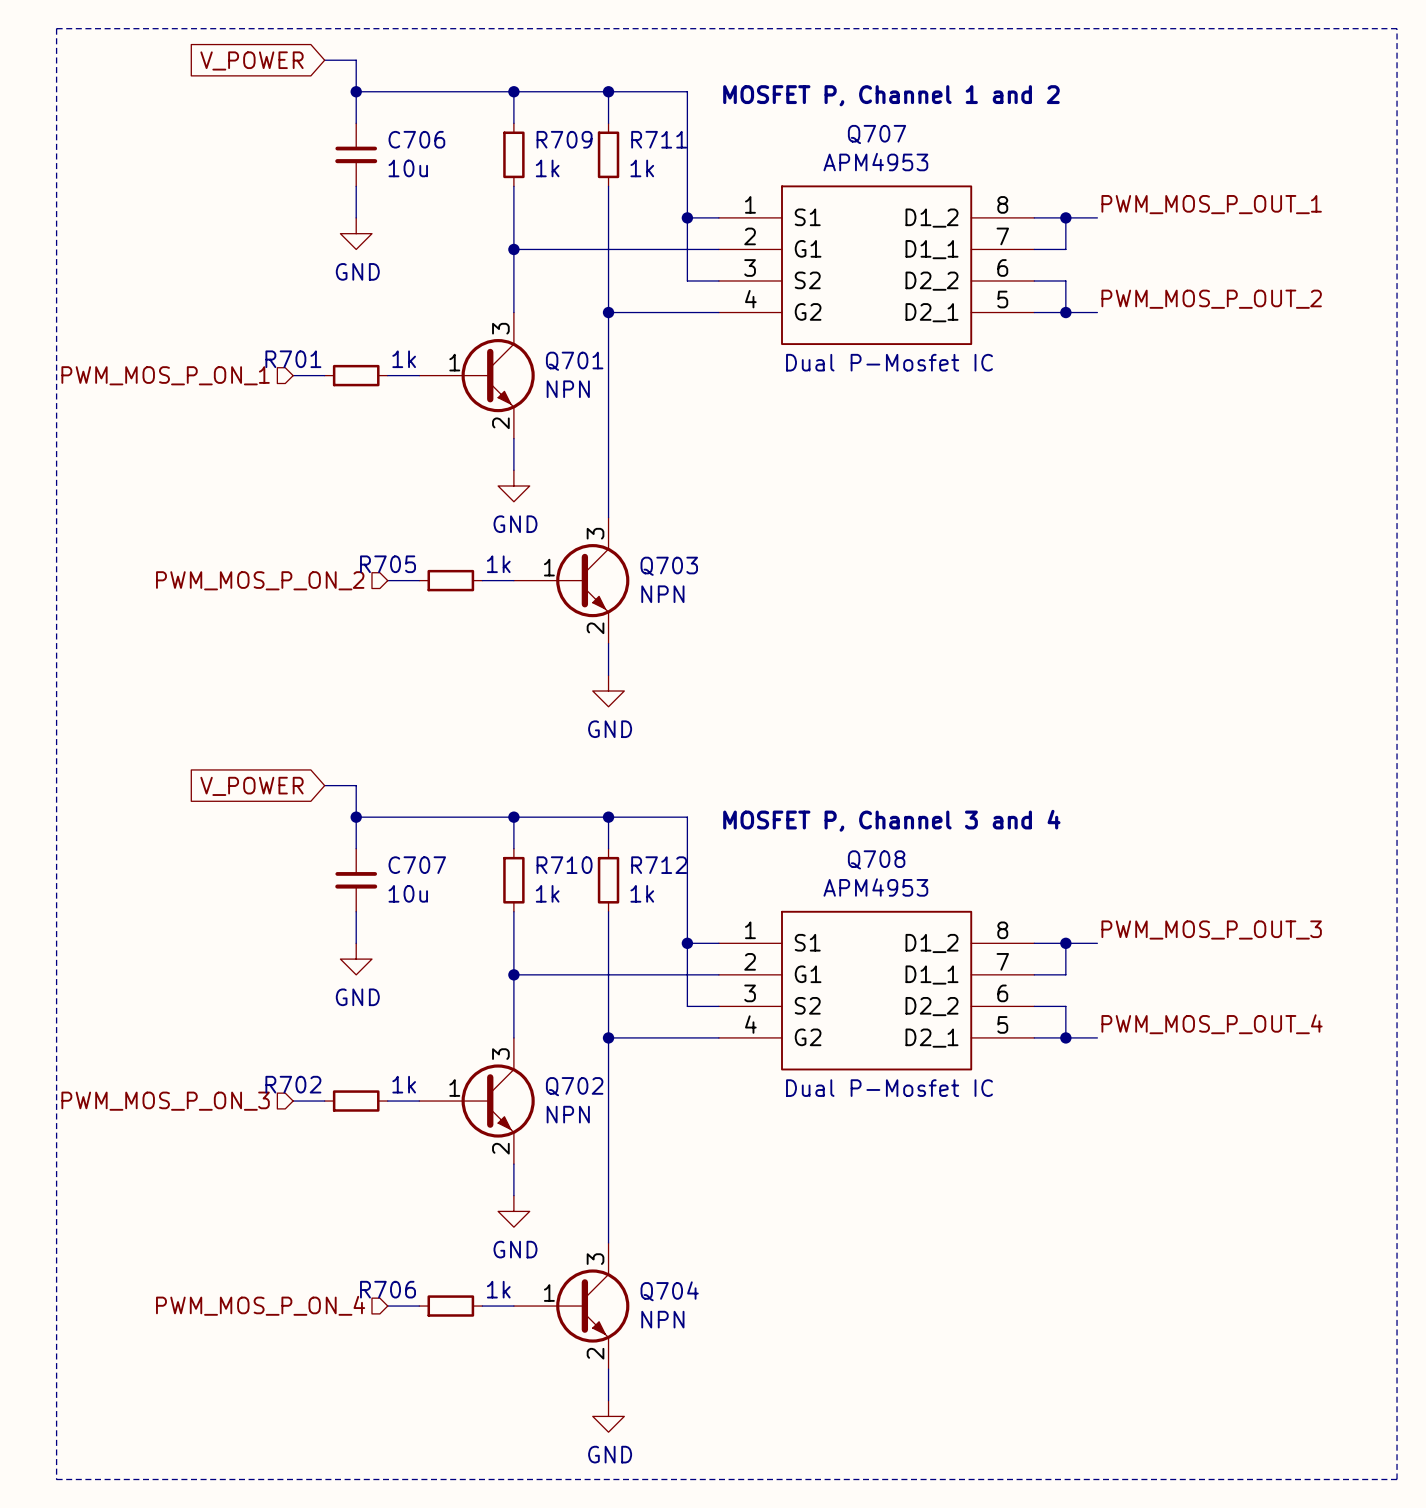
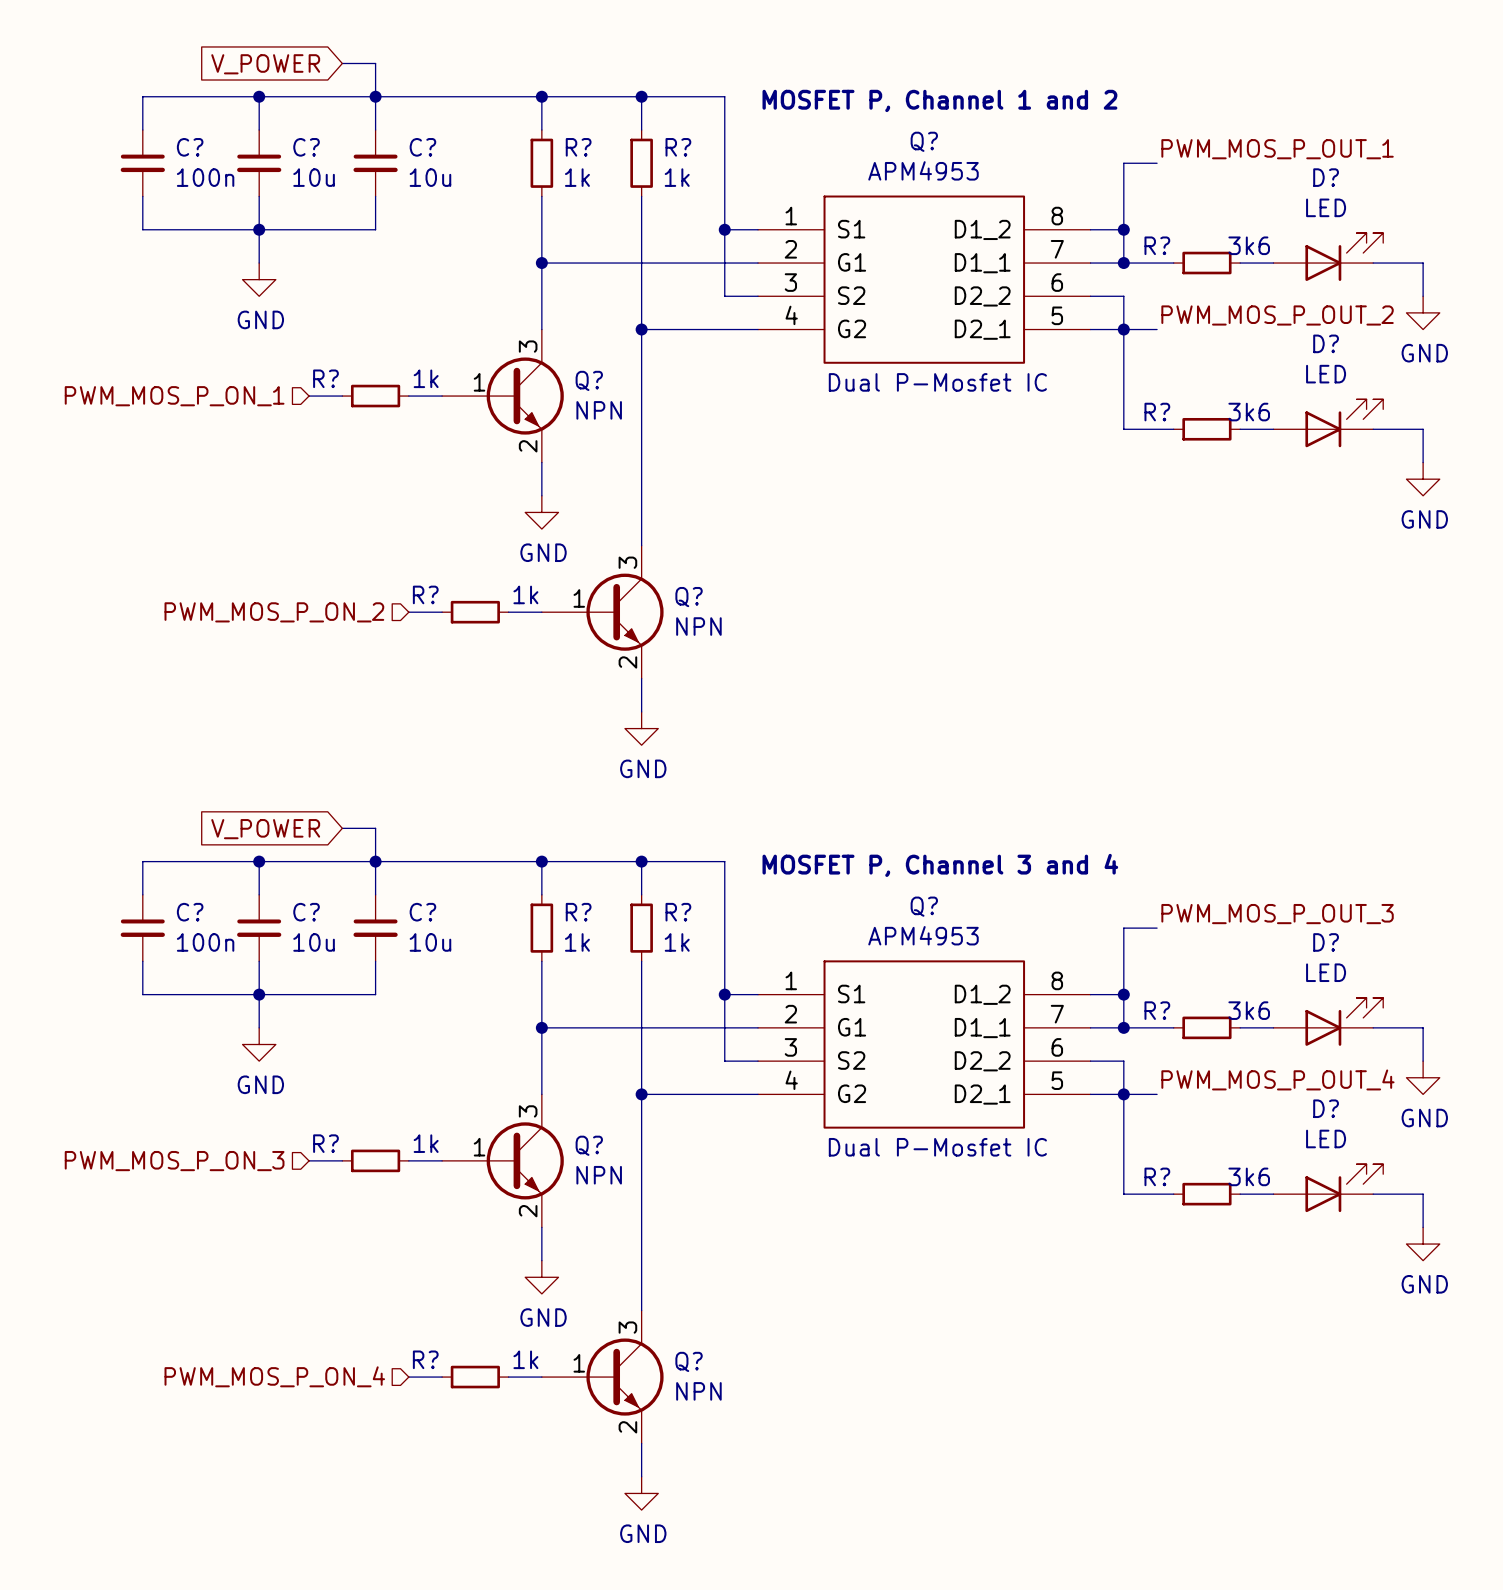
line: (56, 28) (56, 1479) (1397, 1479) (1397, 28) (56, 28) -> none
wire: none -> (259, 96) (259, 130)
junction: none -> (259, 96)
wire: none -> (375, 96) (142, 96) (142, 130)
Q707 name: Q707 (876, 134) -> Q? (924, 141)
C706 name: C706 (416, 139) -> C? (422, 147)
R709 name: R709 (564, 139) -> R? (578, 147)
R711 name: R711 (659, 139) -> R? (678, 147)
C?: none -> 100n (142, 163)
C?: none -> 10u (259, 163)
wire: none -> (142, 196) (142, 229) (375, 229)
wire: none -> (259, 196) (259, 263)
label position: PWM_MOS_P_OUT_1 (1211, 204) -> PWM_MOS_P_OUT_1 (1277, 149)
junction: none -> (259, 229)
wire: (1065, 217) (1097, 217) -> (1123, 229) (1123, 163) (1157, 163)
power symbol position: GND (356, 233) -> GND (259, 279)
D?: none -> LED (1328, 257)
wire: none -> (1123, 263) (1173, 263)
junction: none -> (1123, 263)
R?: none -> 3k6 (1206, 263)
wire: none -> (1240, 263) (1273, 263)
wire: none -> (1373, 263) (1423, 263) (1423, 296)
power symbol: none -> GND (1423, 312)
wire: none -> (1123, 329) (1123, 429) (1173, 429)
R701 name: R701 (293, 359) -> R? (325, 378)
Q701 name: Q701 (574, 361) -> Q? (589, 380)
D?: none -> LED (1328, 423)
R?: none -> 3k6 (1206, 429)
wire: none -> (1240, 429) (1273, 429)
wire: none -> (1373, 429) (1423, 429) (1423, 462)
power symbol: none -> GND (1423, 479)
R705 name: R705 (388, 564) -> R? (425, 594)
Q703 name: Q703 (669, 566) -> Q? (689, 597)
wire: none -> (259, 861) (259, 894)
junction: none -> (259, 861)
wire: none -> (375, 861) (142, 861) (142, 894)
Q708 name: Q708 (876, 859) -> Q? (924, 906)
C707 name: C707 (417, 865) -> C? (422, 912)
R710 name: R710 (564, 865) -> R? (578, 912)
R712 name: R712 (659, 865) -> R? (678, 912)
C?: none -> 100n (142, 928)
C?: none -> 10u (259, 928)
wire: none -> (142, 961) (142, 994) (375, 994)
wire: none -> (259, 961) (259, 1027)
label position: PWM_MOS_P_OUT_3 (1211, 930) -> PWM_MOS_P_OUT_3 (1277, 914)
junction: none -> (259, 994)
wire: (1065, 943) (1097, 943) -> (1123, 994) (1123, 928) (1157, 928)
power symbol position: GND (356, 959) -> GND (259, 1044)
D?: none -> LED (1328, 1021)
wire: none -> (1123, 1027) (1173, 1027)
junction: none -> (1123, 1027)
R?: none -> 3k6 (1206, 1027)
wire: none -> (1240, 1027) (1273, 1027)
wire: none -> (1373, 1027) (1423, 1027) (1423, 1061)
power symbol: none -> GND (1423, 1077)
wire: none -> (1123, 1094) (1123, 1194) (1173, 1194)
R702 name: R702 (293, 1084) -> R? (325, 1143)
Q702 name: Q702 (574, 1086) -> Q? (589, 1145)
D?: none -> LED (1328, 1188)
R?: none -> 3k6 (1206, 1194)
wire: none -> (1240, 1194) (1273, 1194)
wire: none -> (1373, 1194) (1423, 1194) (1423, 1227)
power symbol: none -> GND (1423, 1244)
R706 name: R706 (388, 1289) -> R? (425, 1359)
Q704 name: Q704 (669, 1291) -> Q? (689, 1361)

